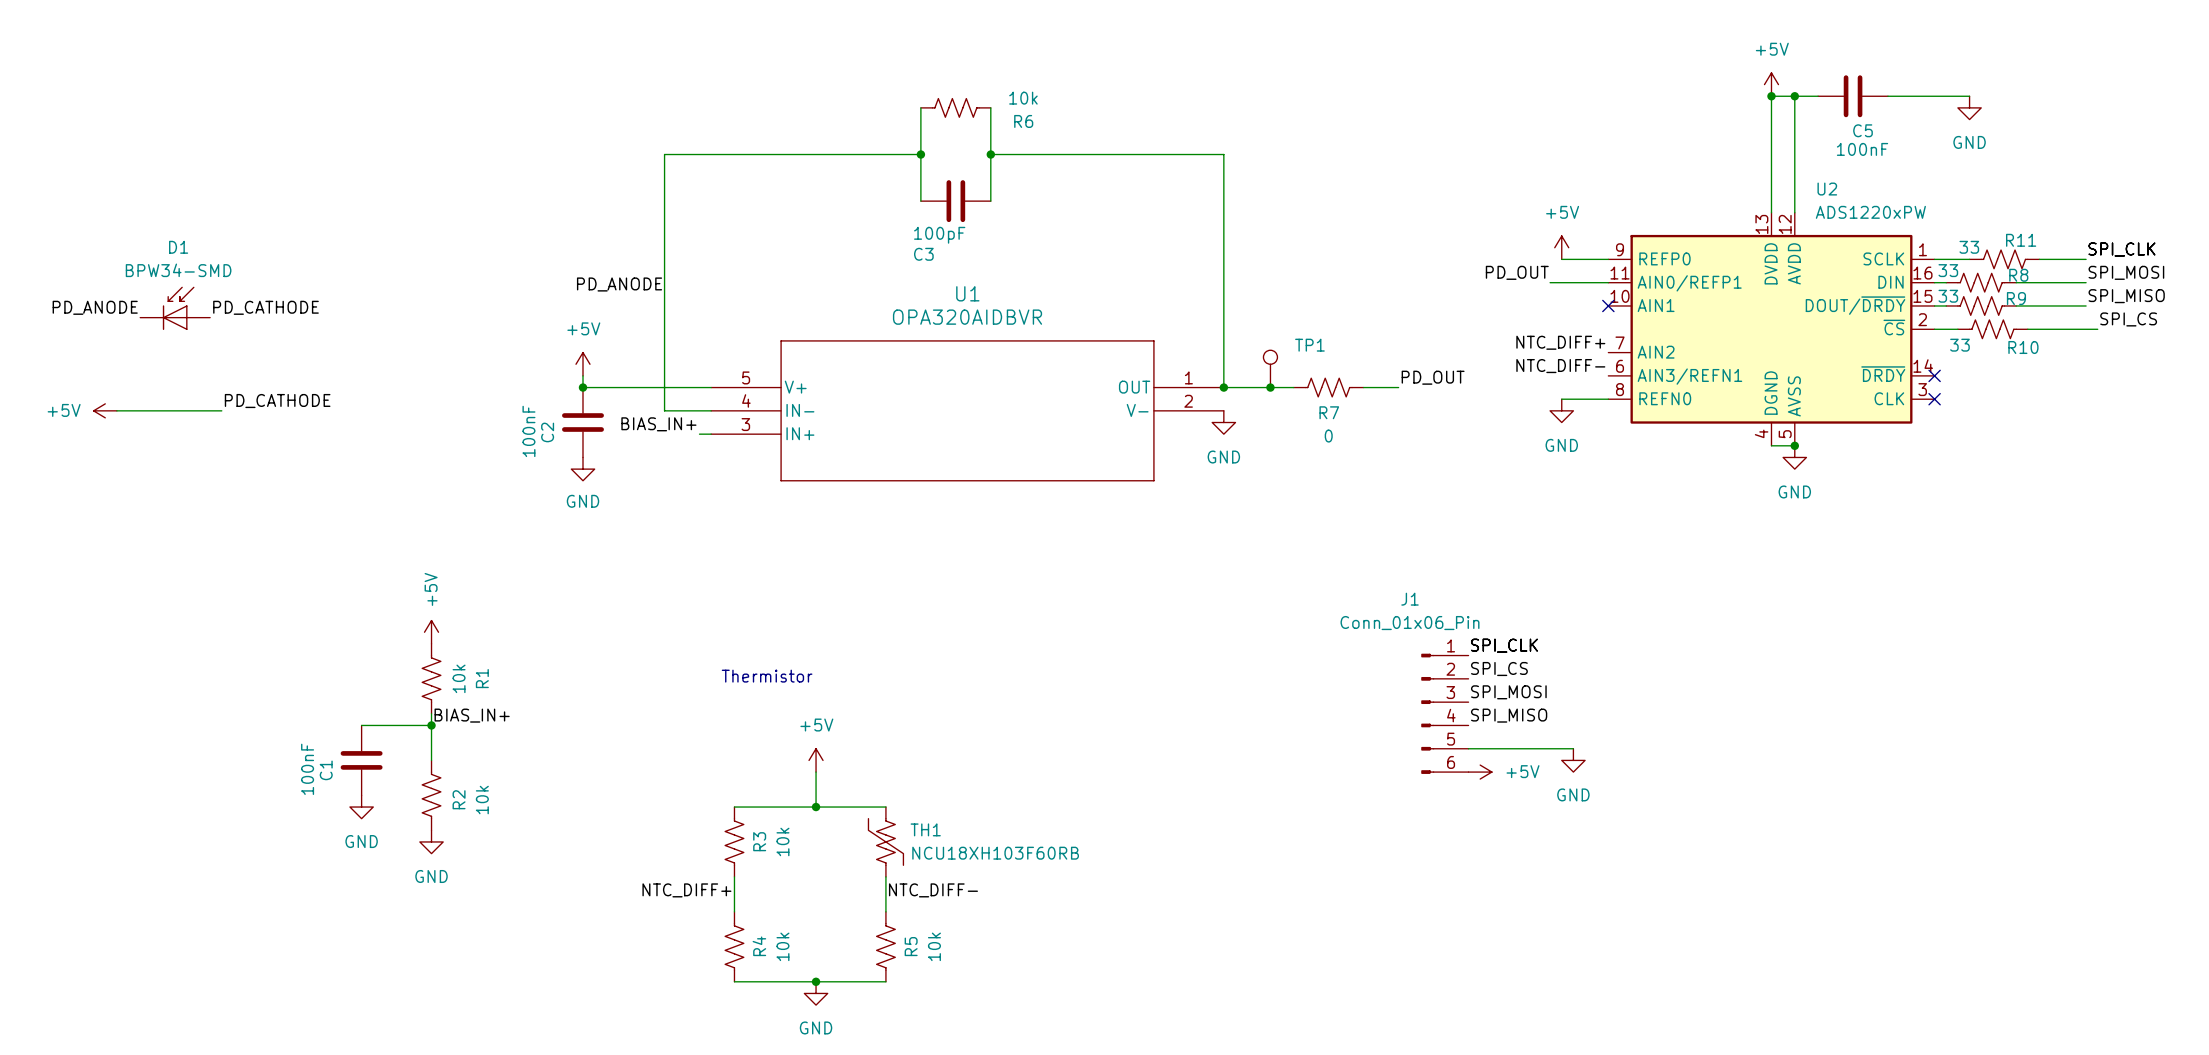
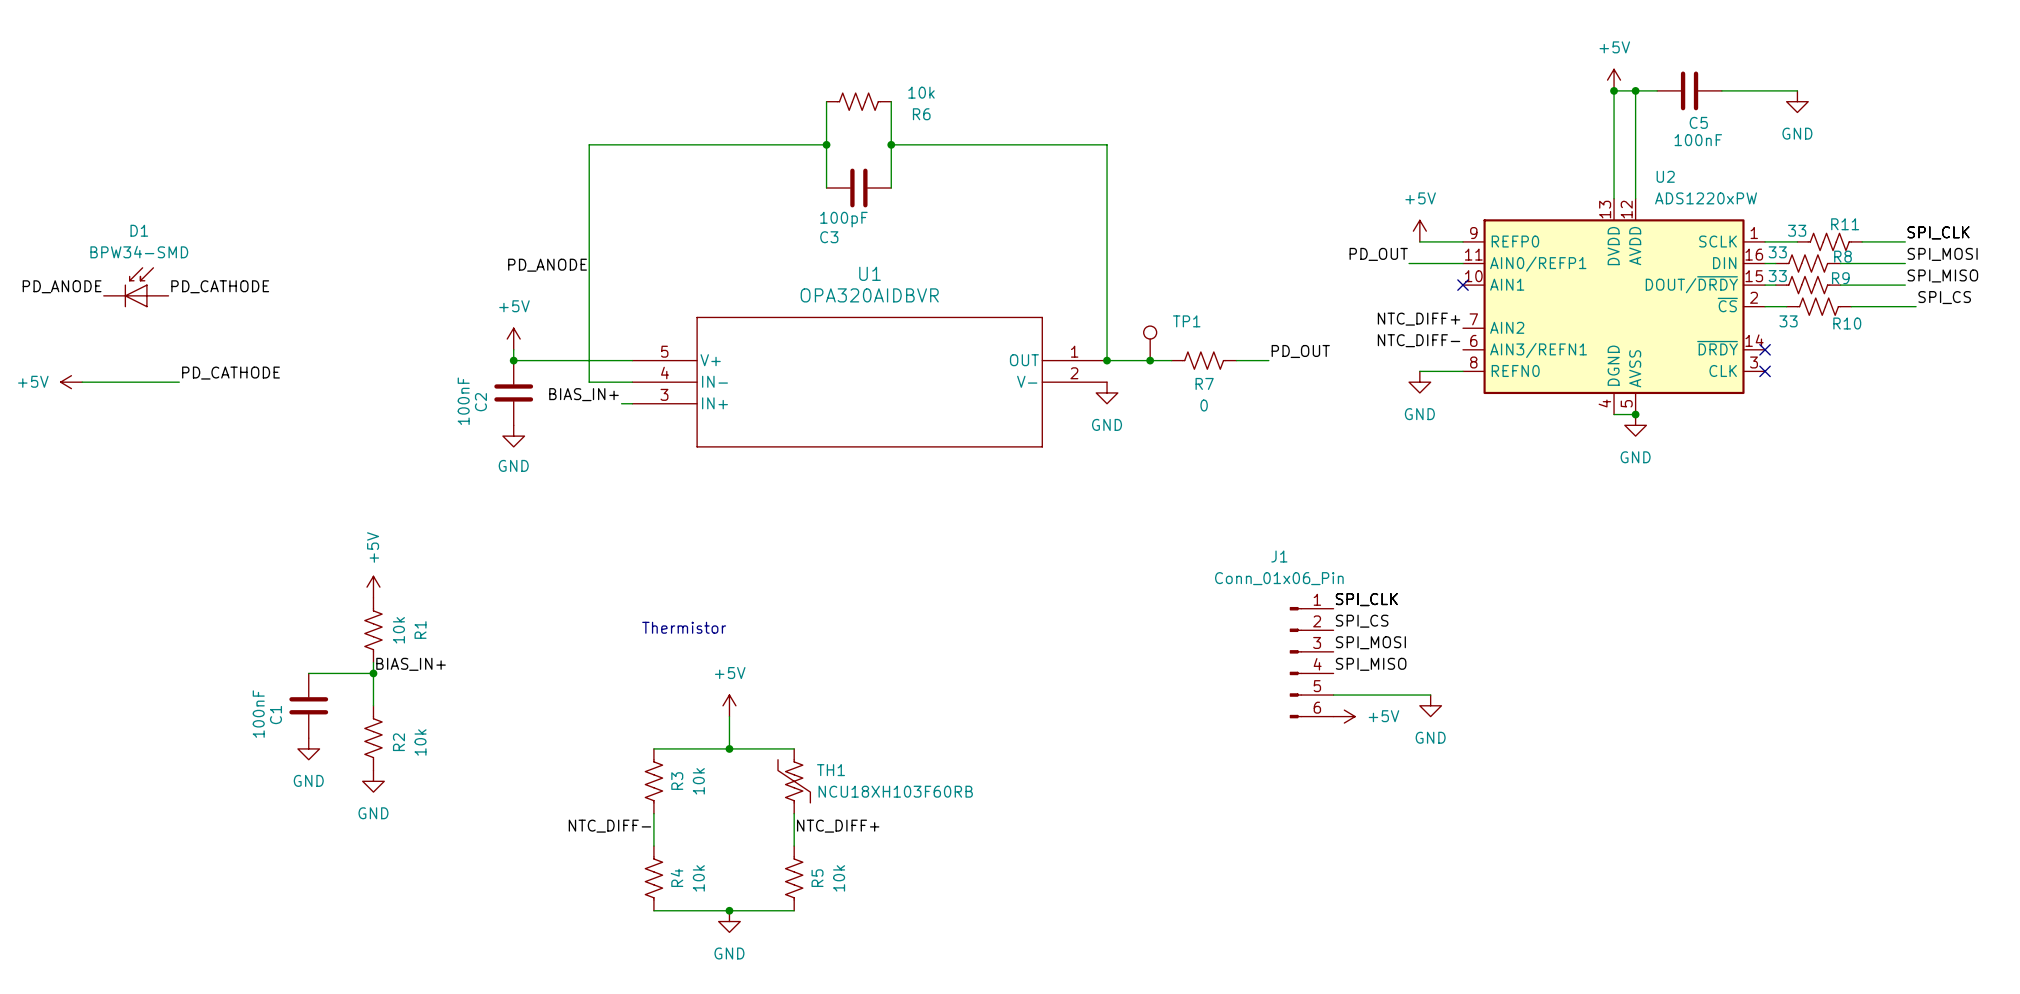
label: NTC_DIFF+ (686, 890) -> NTC_DIFF- (609, 826)
label: NTC_DIFF- (933, 890) -> NTC_DIFF+ (838, 826)

